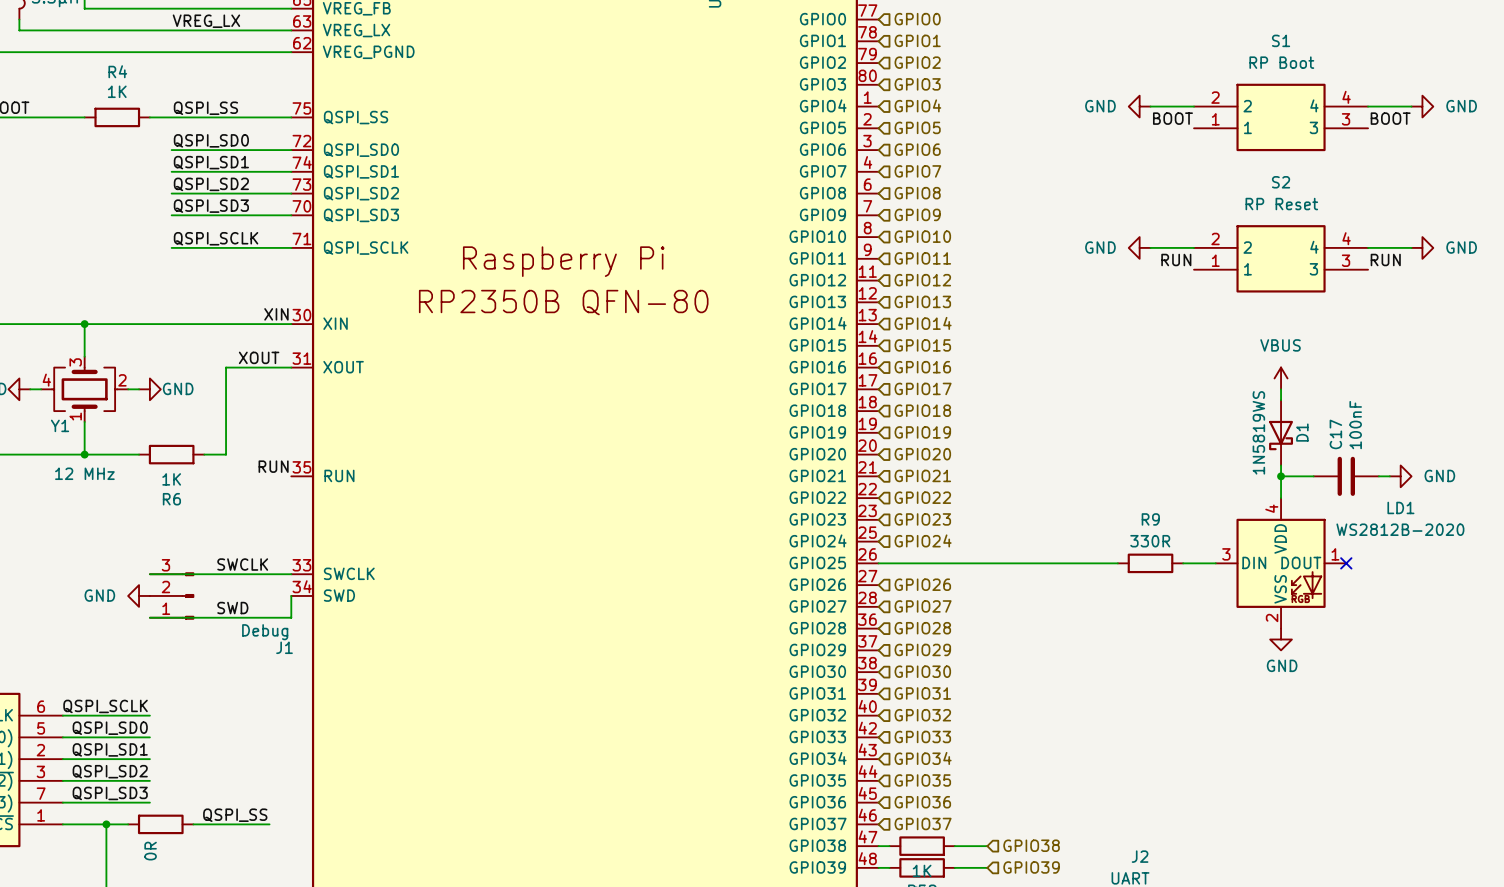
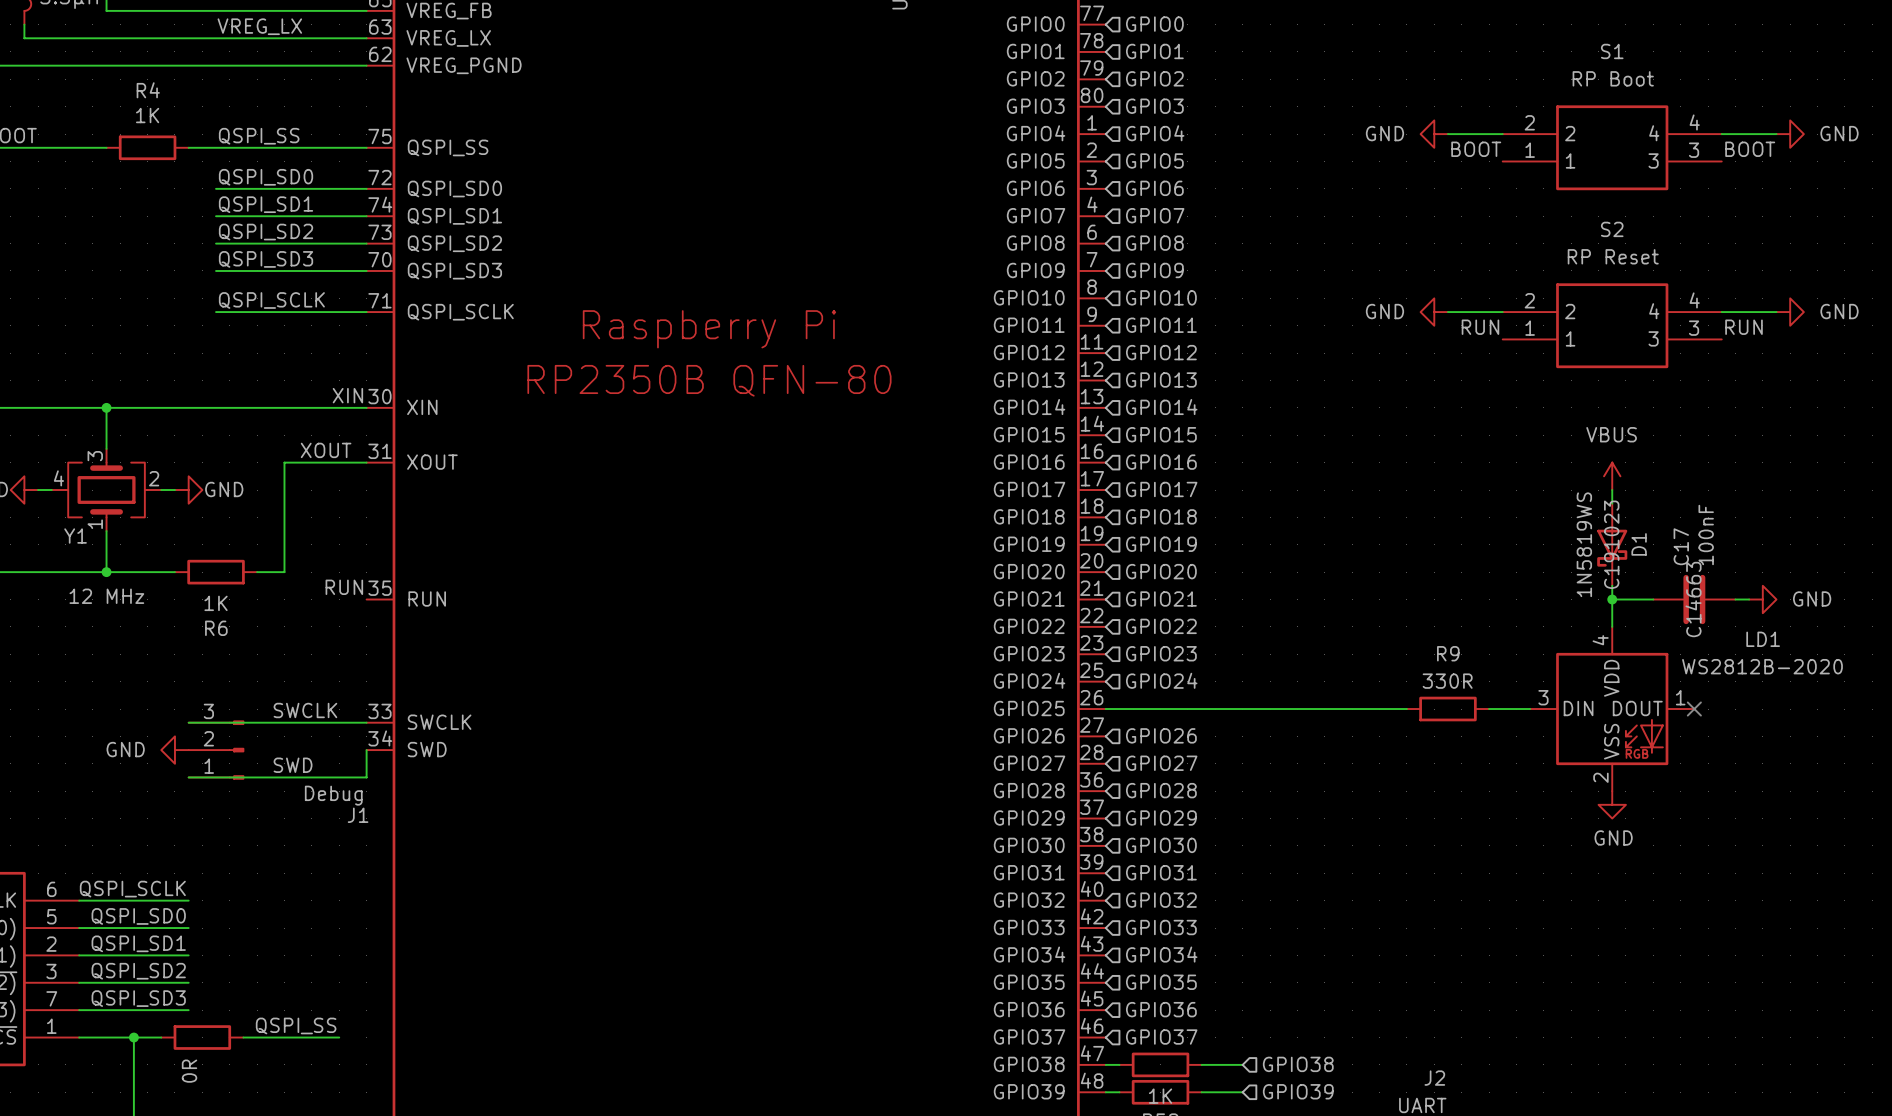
D1 text: none -> C191023 (1611, 544)
C17 text: none -> C14663 (1693, 599)

